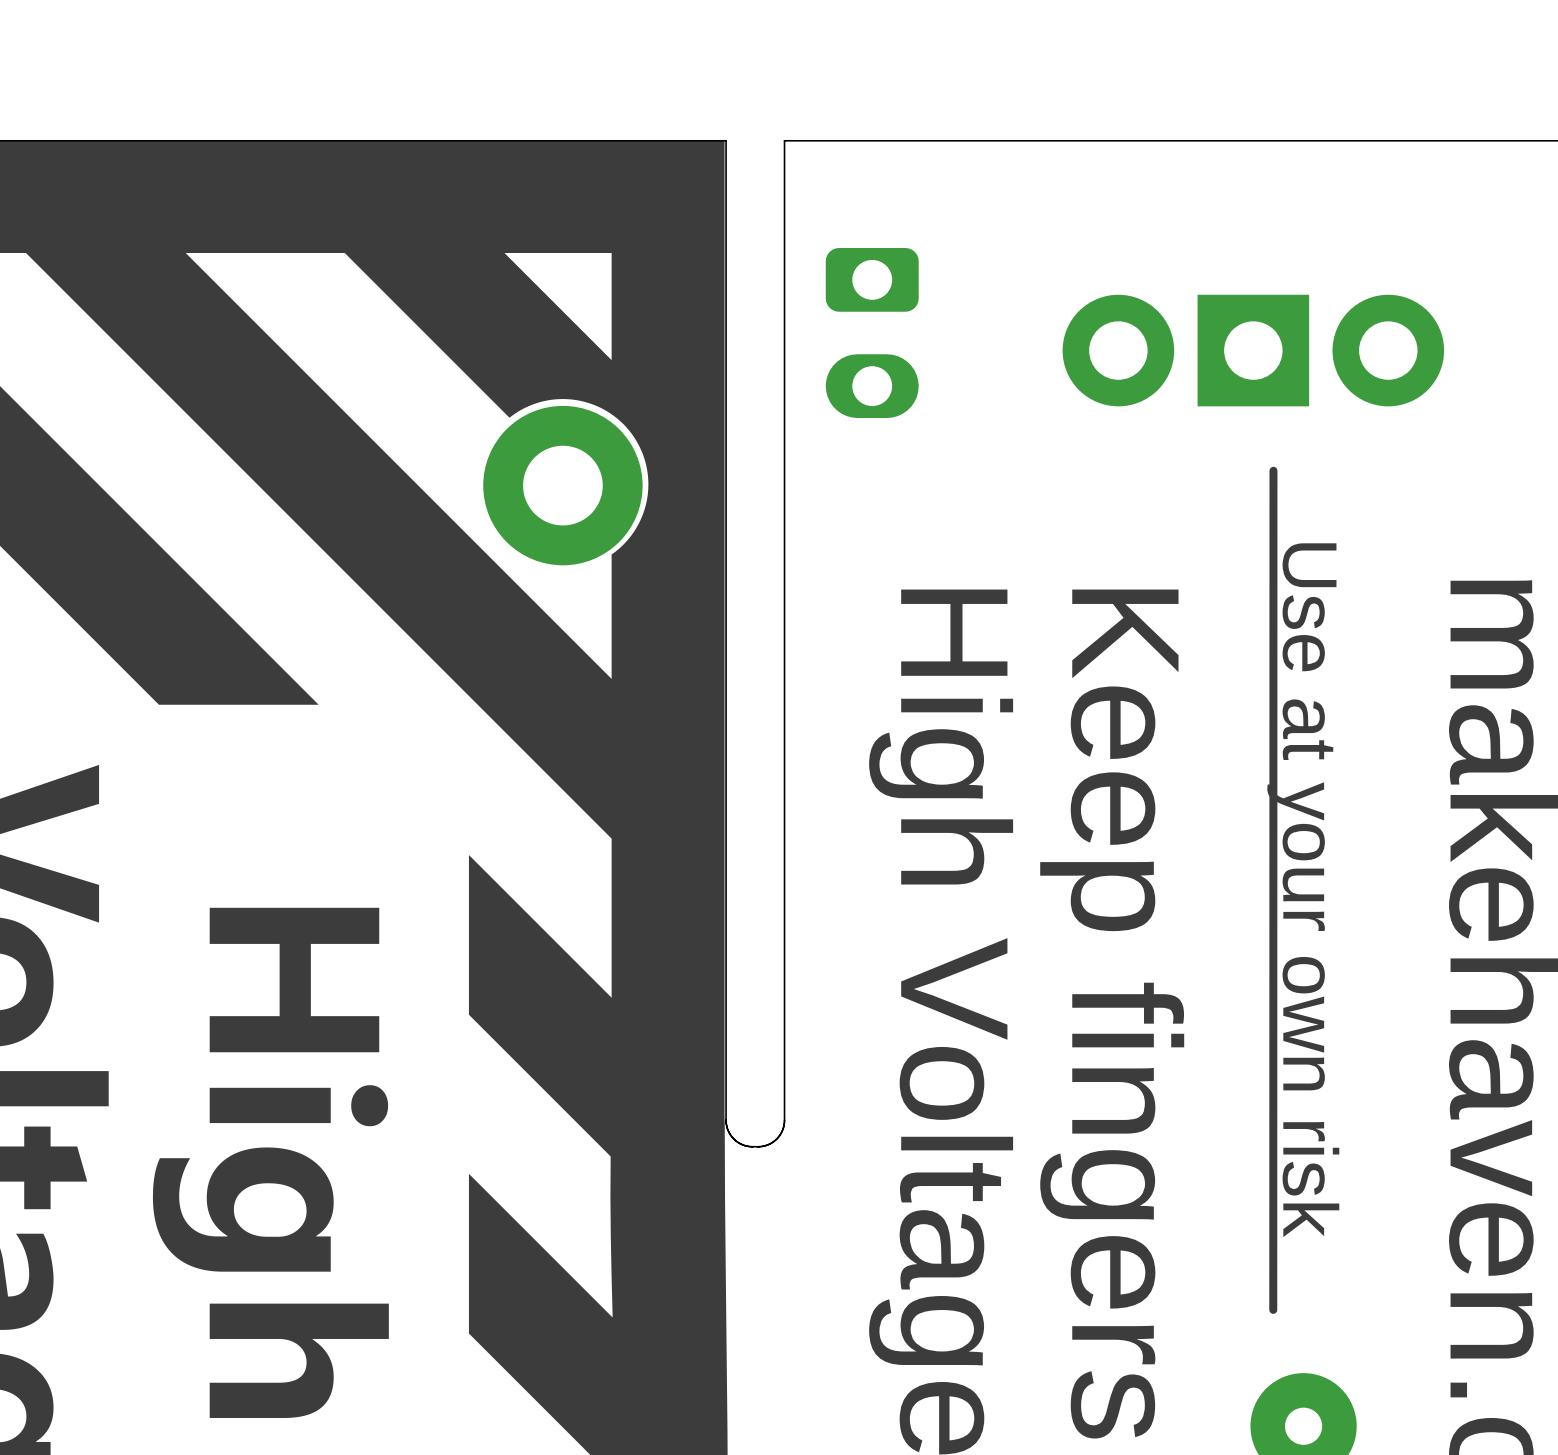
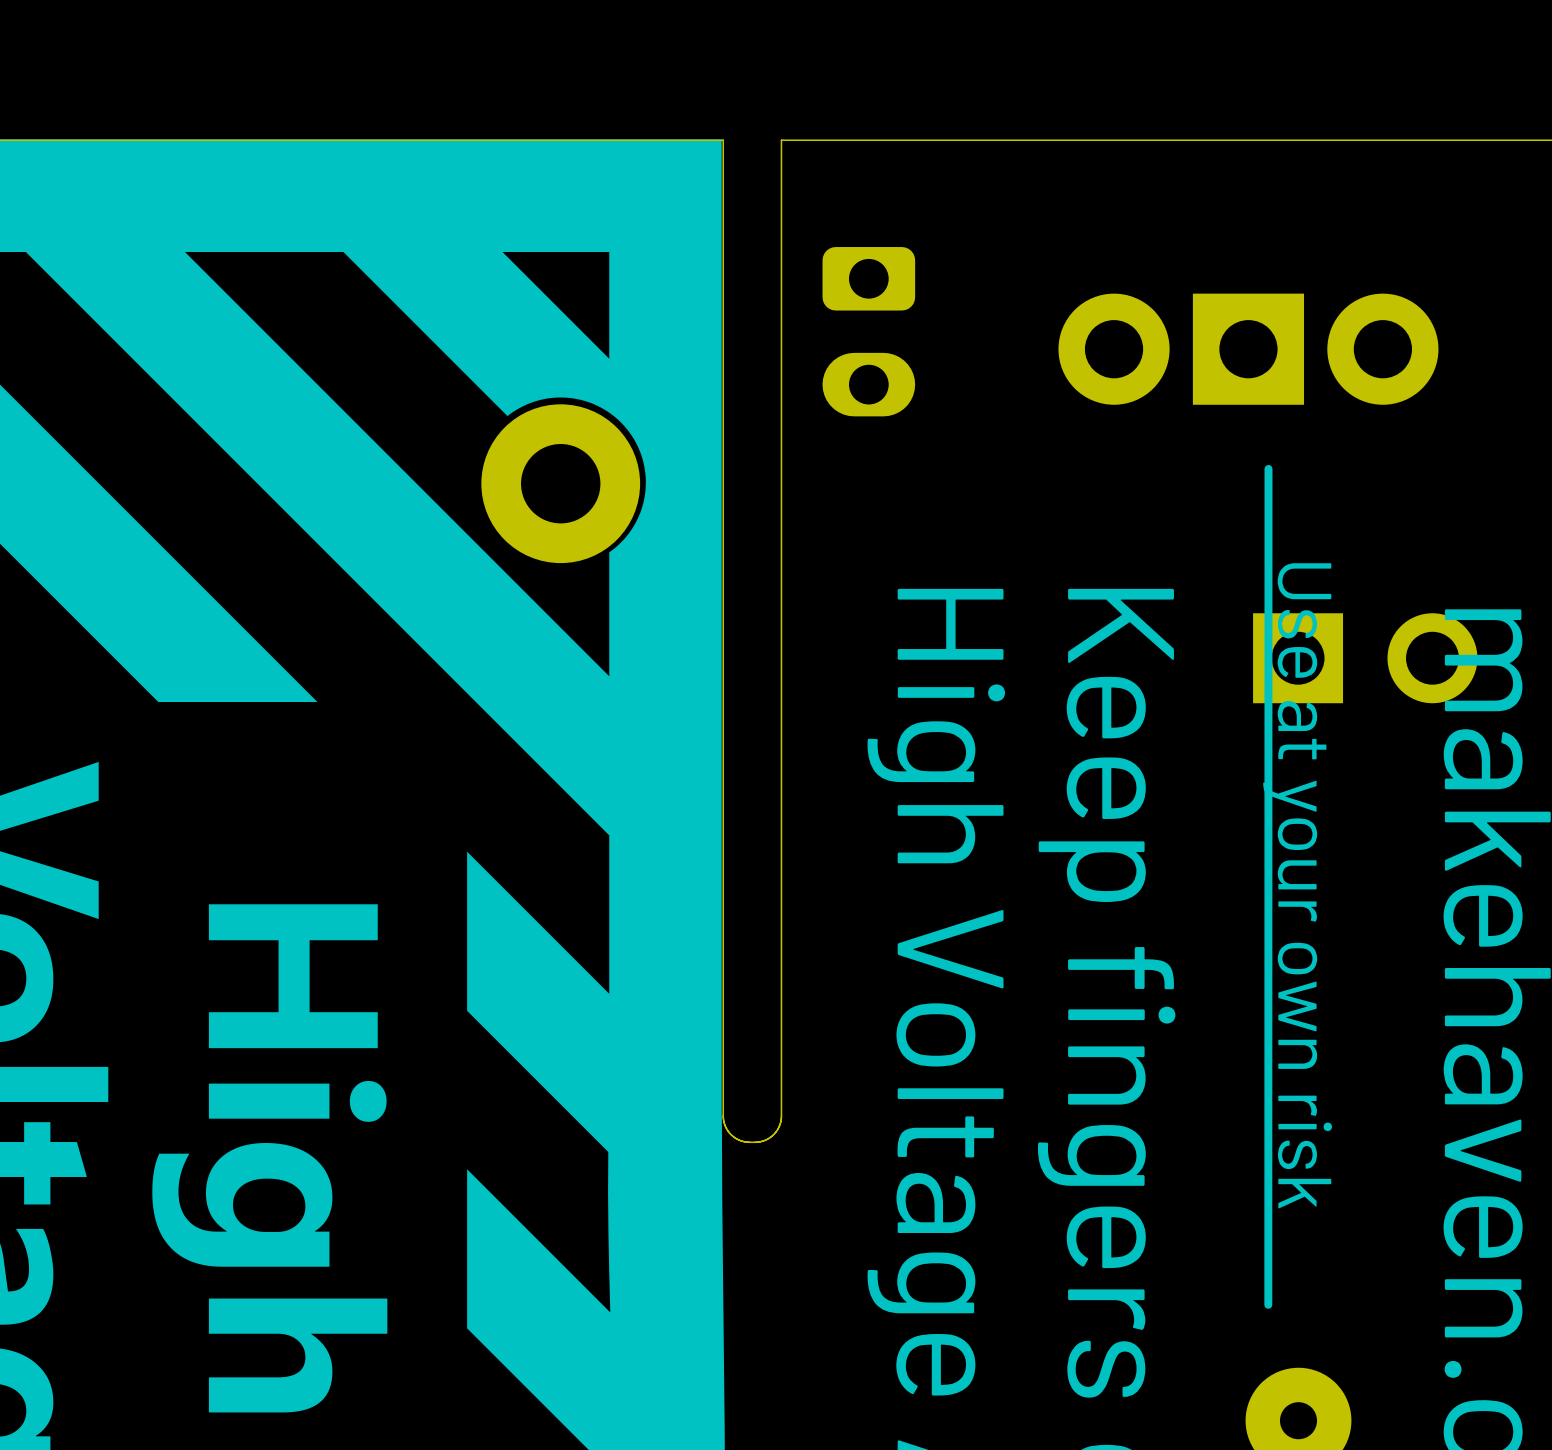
part: none -> (1365, 658)

